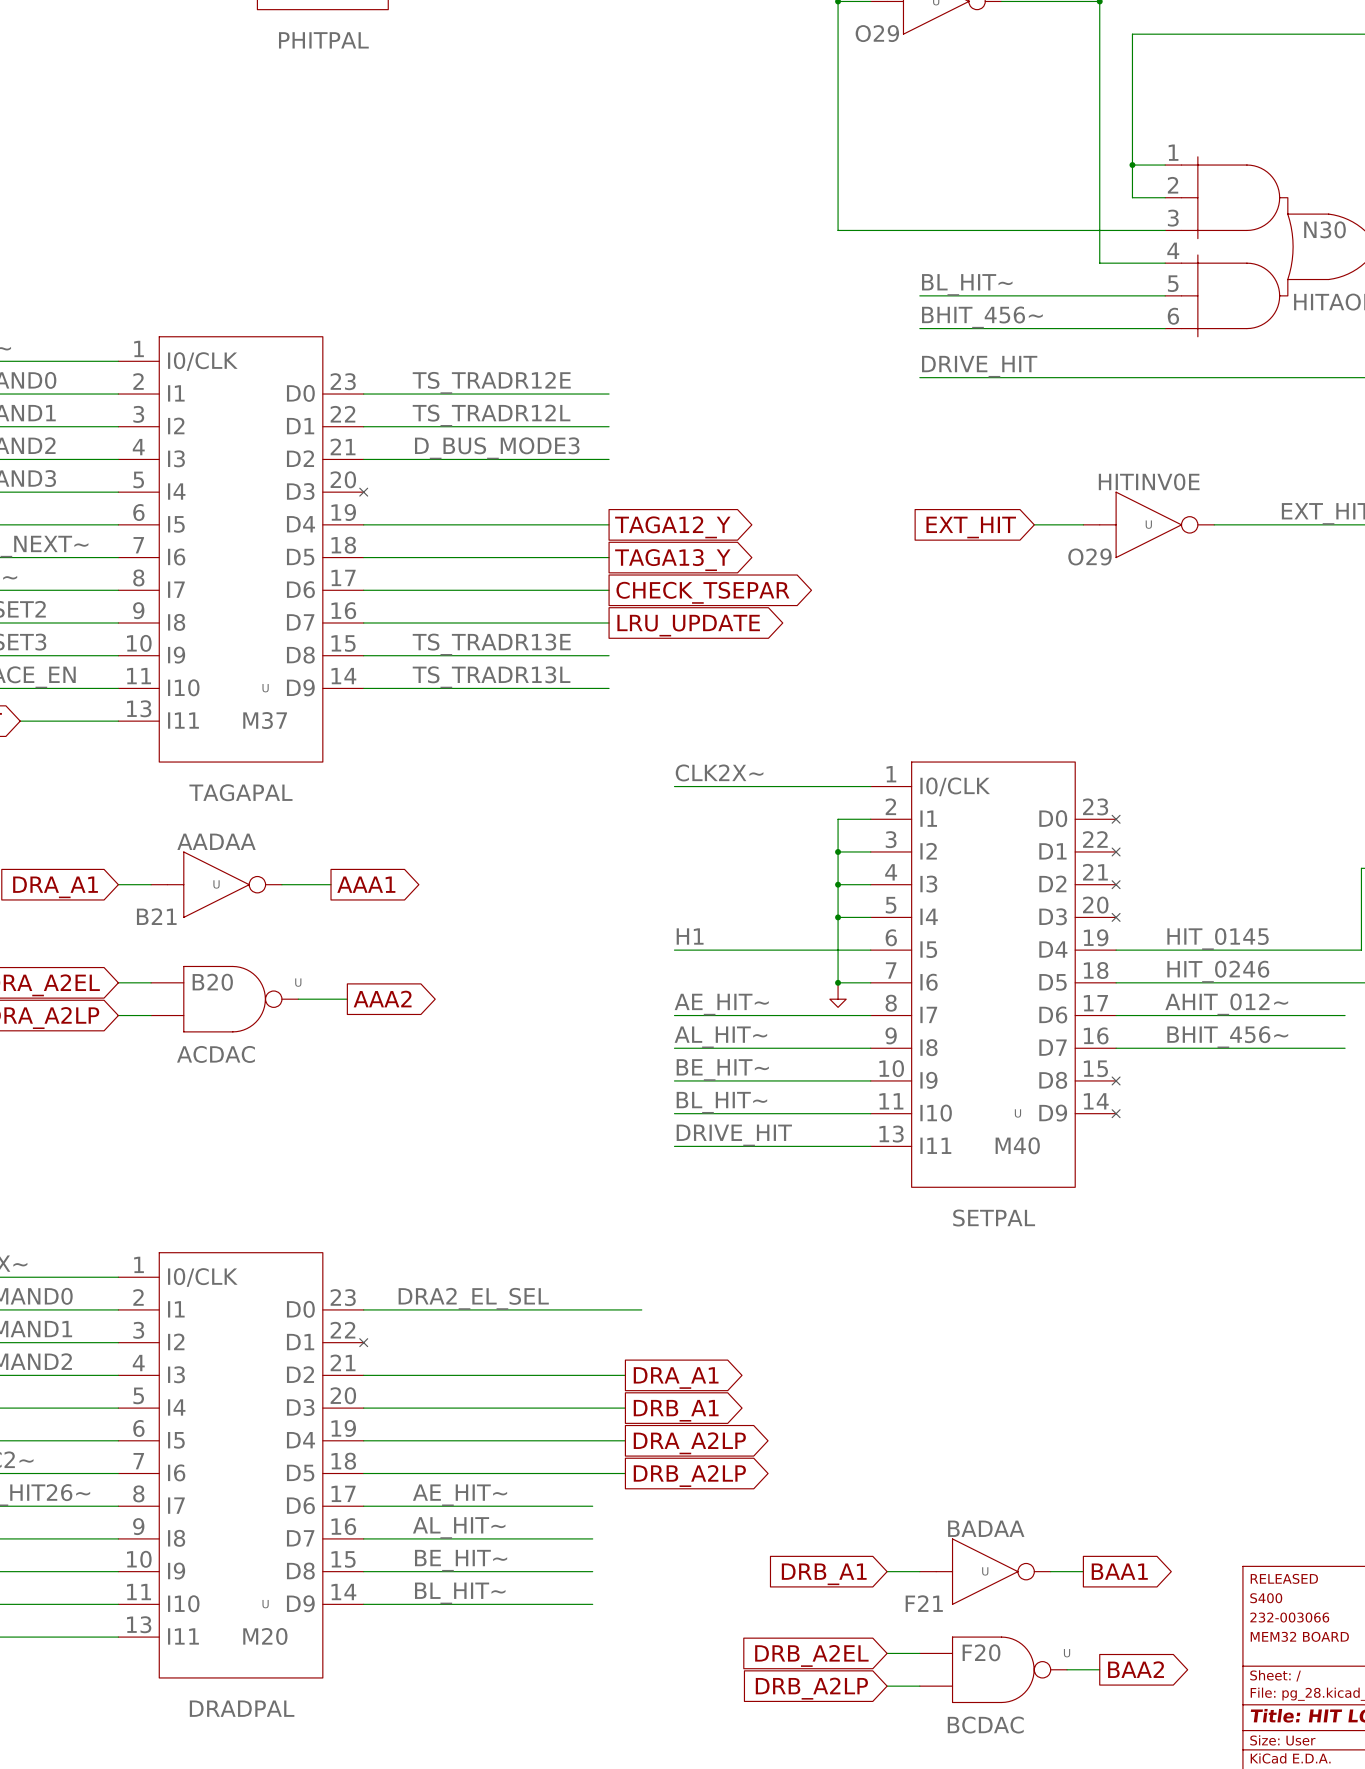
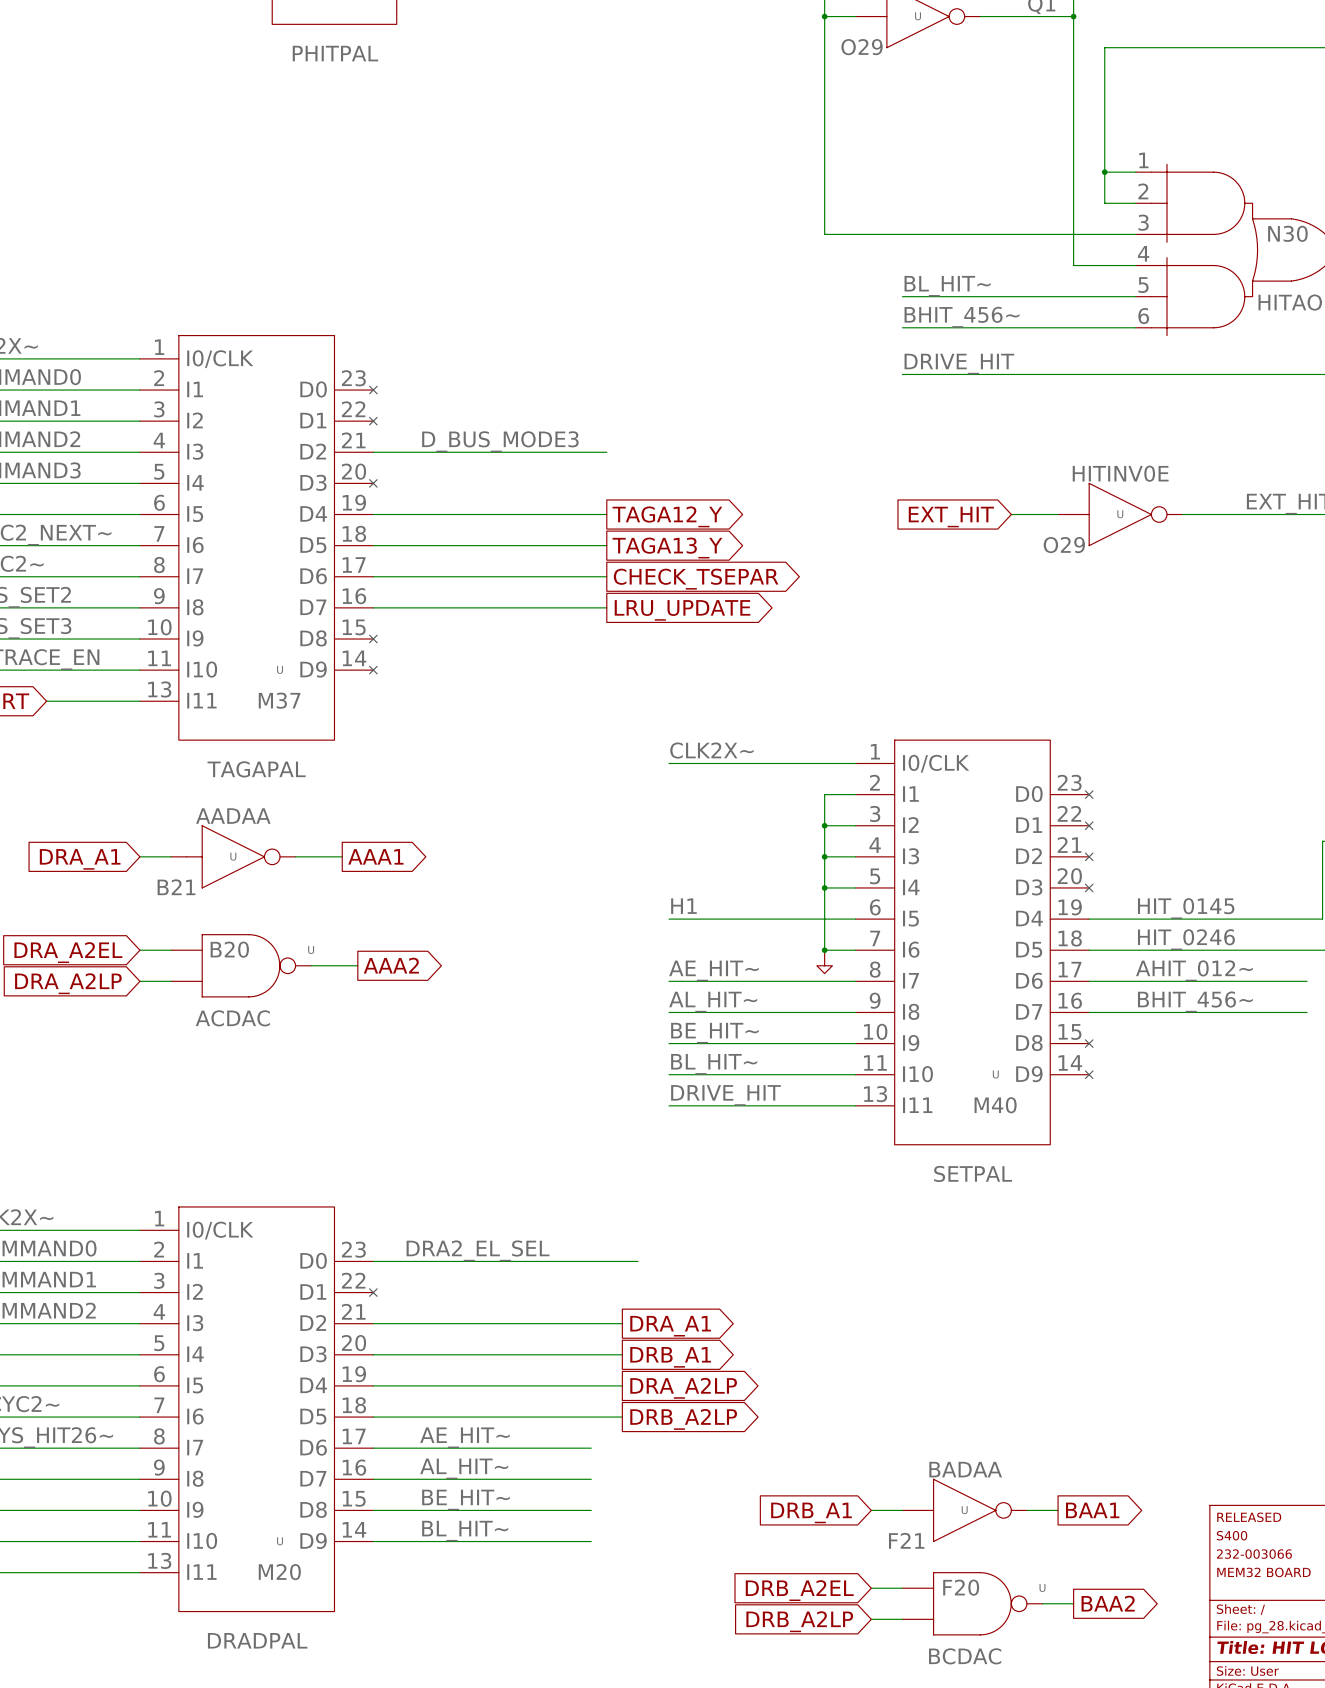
label: TS_TRADR12E (491, 382) -> none
wire: (363, 394) (609, 394) -> none
no-connect mark: none -> (373, 390)
label: TS_TRADR12L (491, 415) -> none
wire: (363, 426) (609, 426) -> none
no-connect mark: none -> (373, 421)
label: TS_TRADR13E (491, 644) -> none
wire: (363, 655) (609, 655) -> none
no-connect mark: none -> (373, 639)
label: TS_TRADR13L (491, 677) -> none
wire: (363, 688) (609, 688) -> none
no-connect mark: none -> (373, 670)

